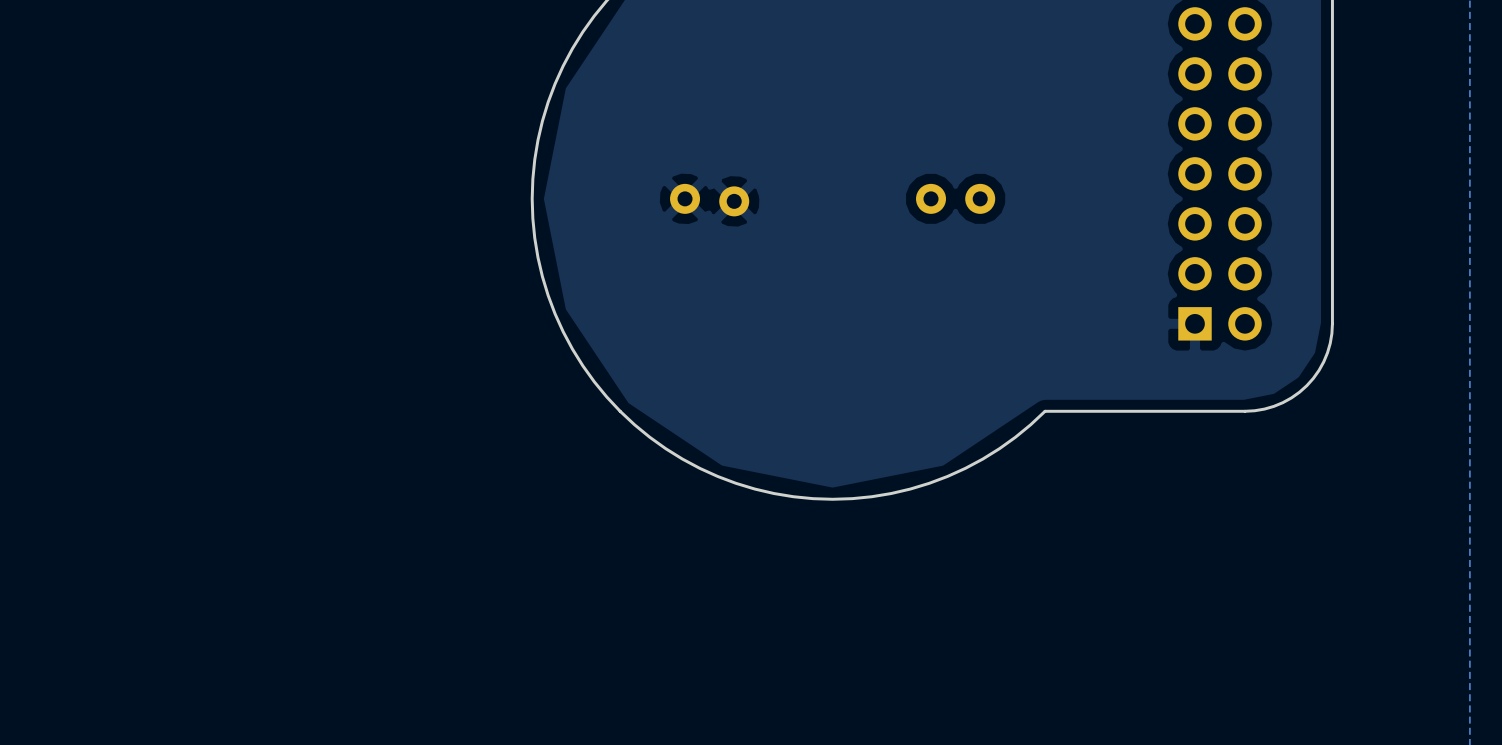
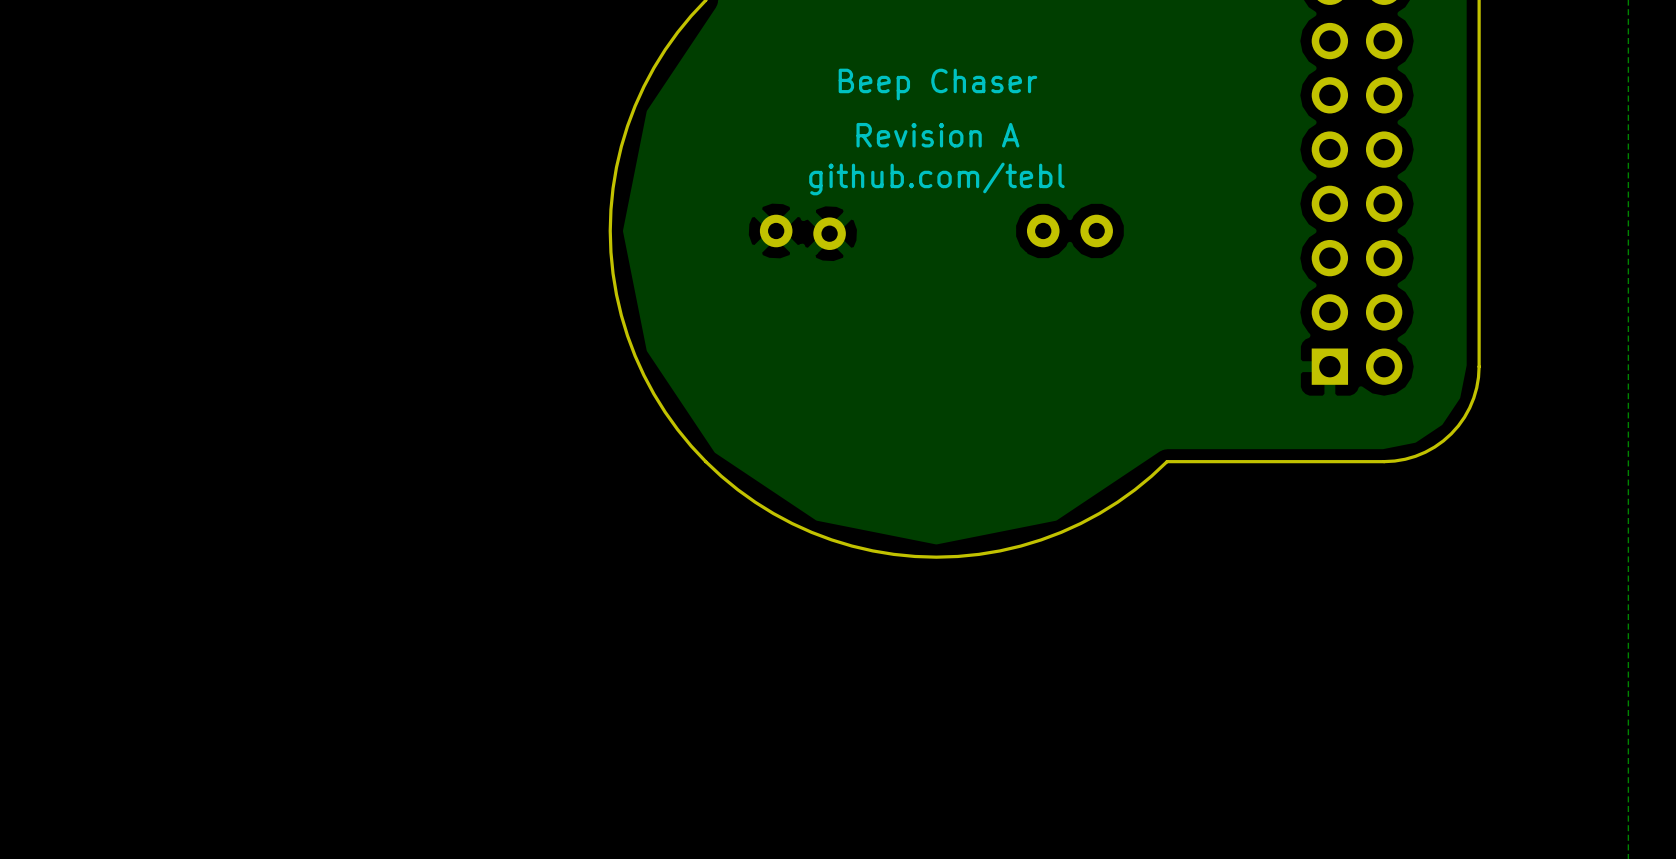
text: none -> Beep Chaser (937, 84)
text: none -> Revision A (937, 135)
text: none -> github.com/tebl (936, 178)

